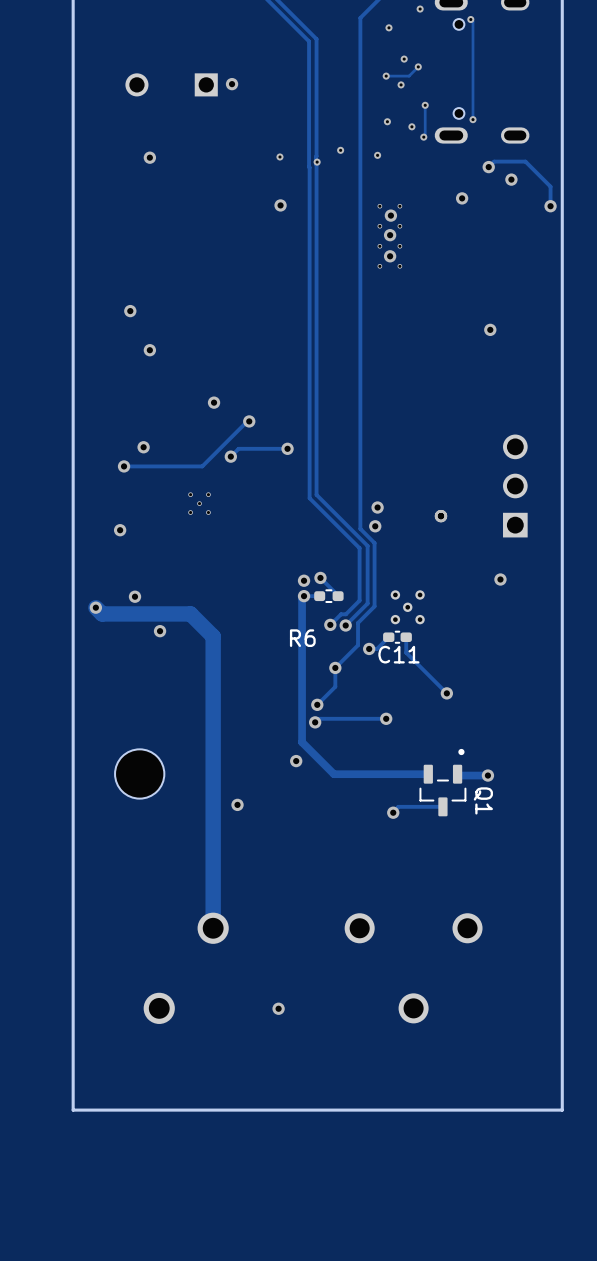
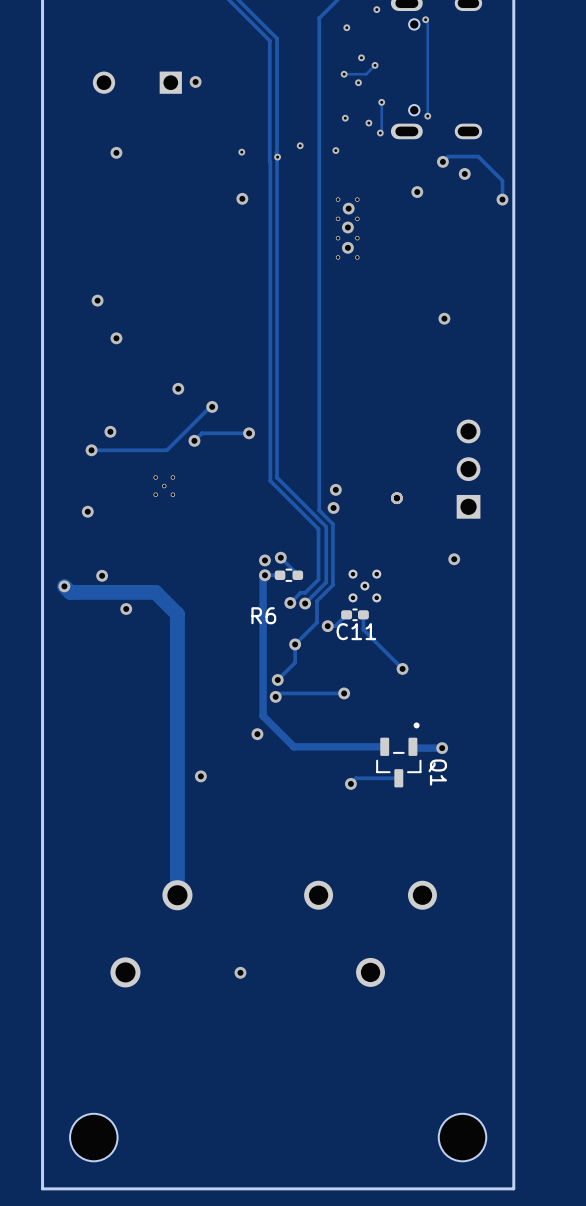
part: (139, 773) -> none
board edge: (562, 1110) (73, 1110) -> (513, 1070) (513, 1188) (42, 1188) (42, 1070)
part: none -> (93, 1137)
part: none -> (462, 1137)

